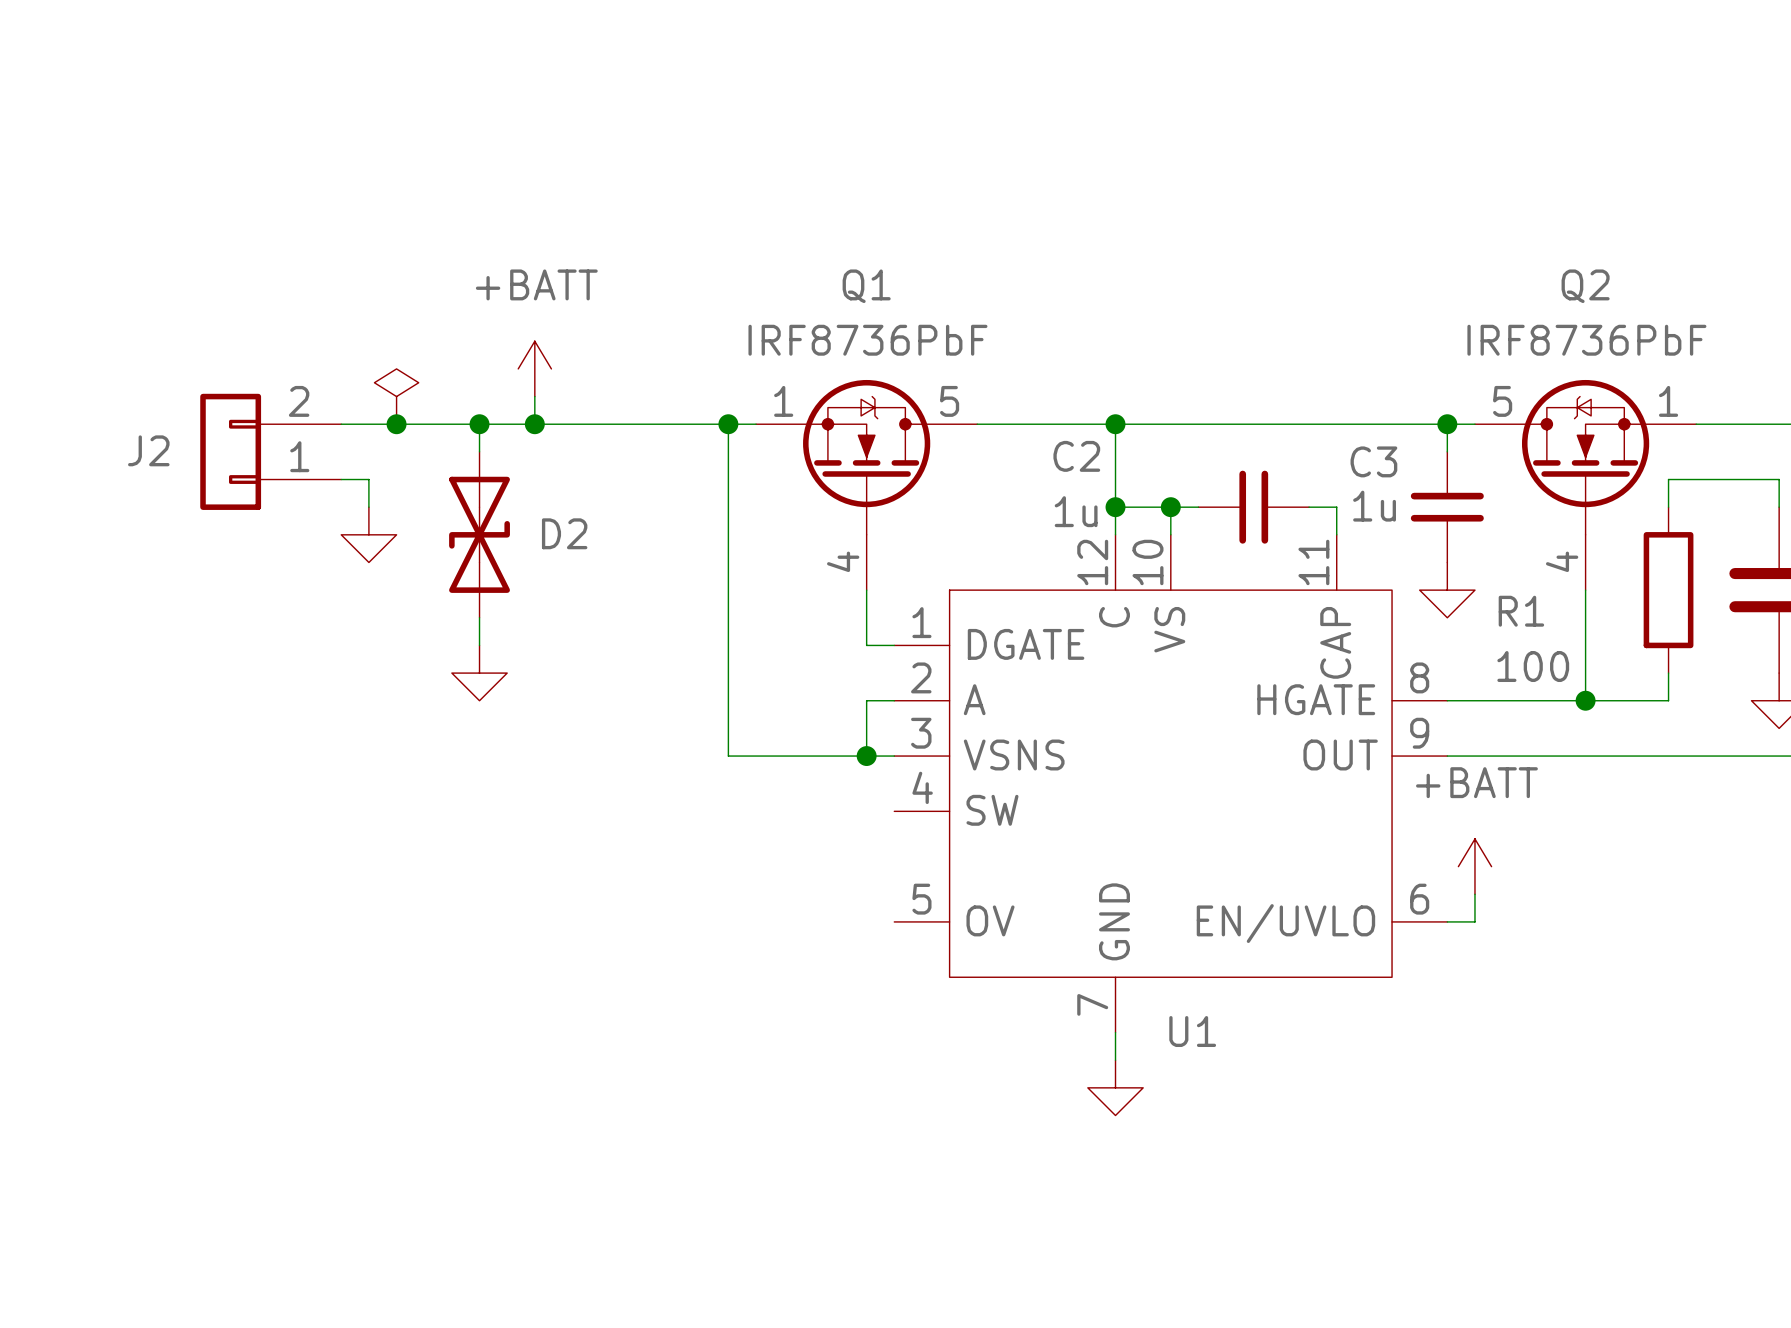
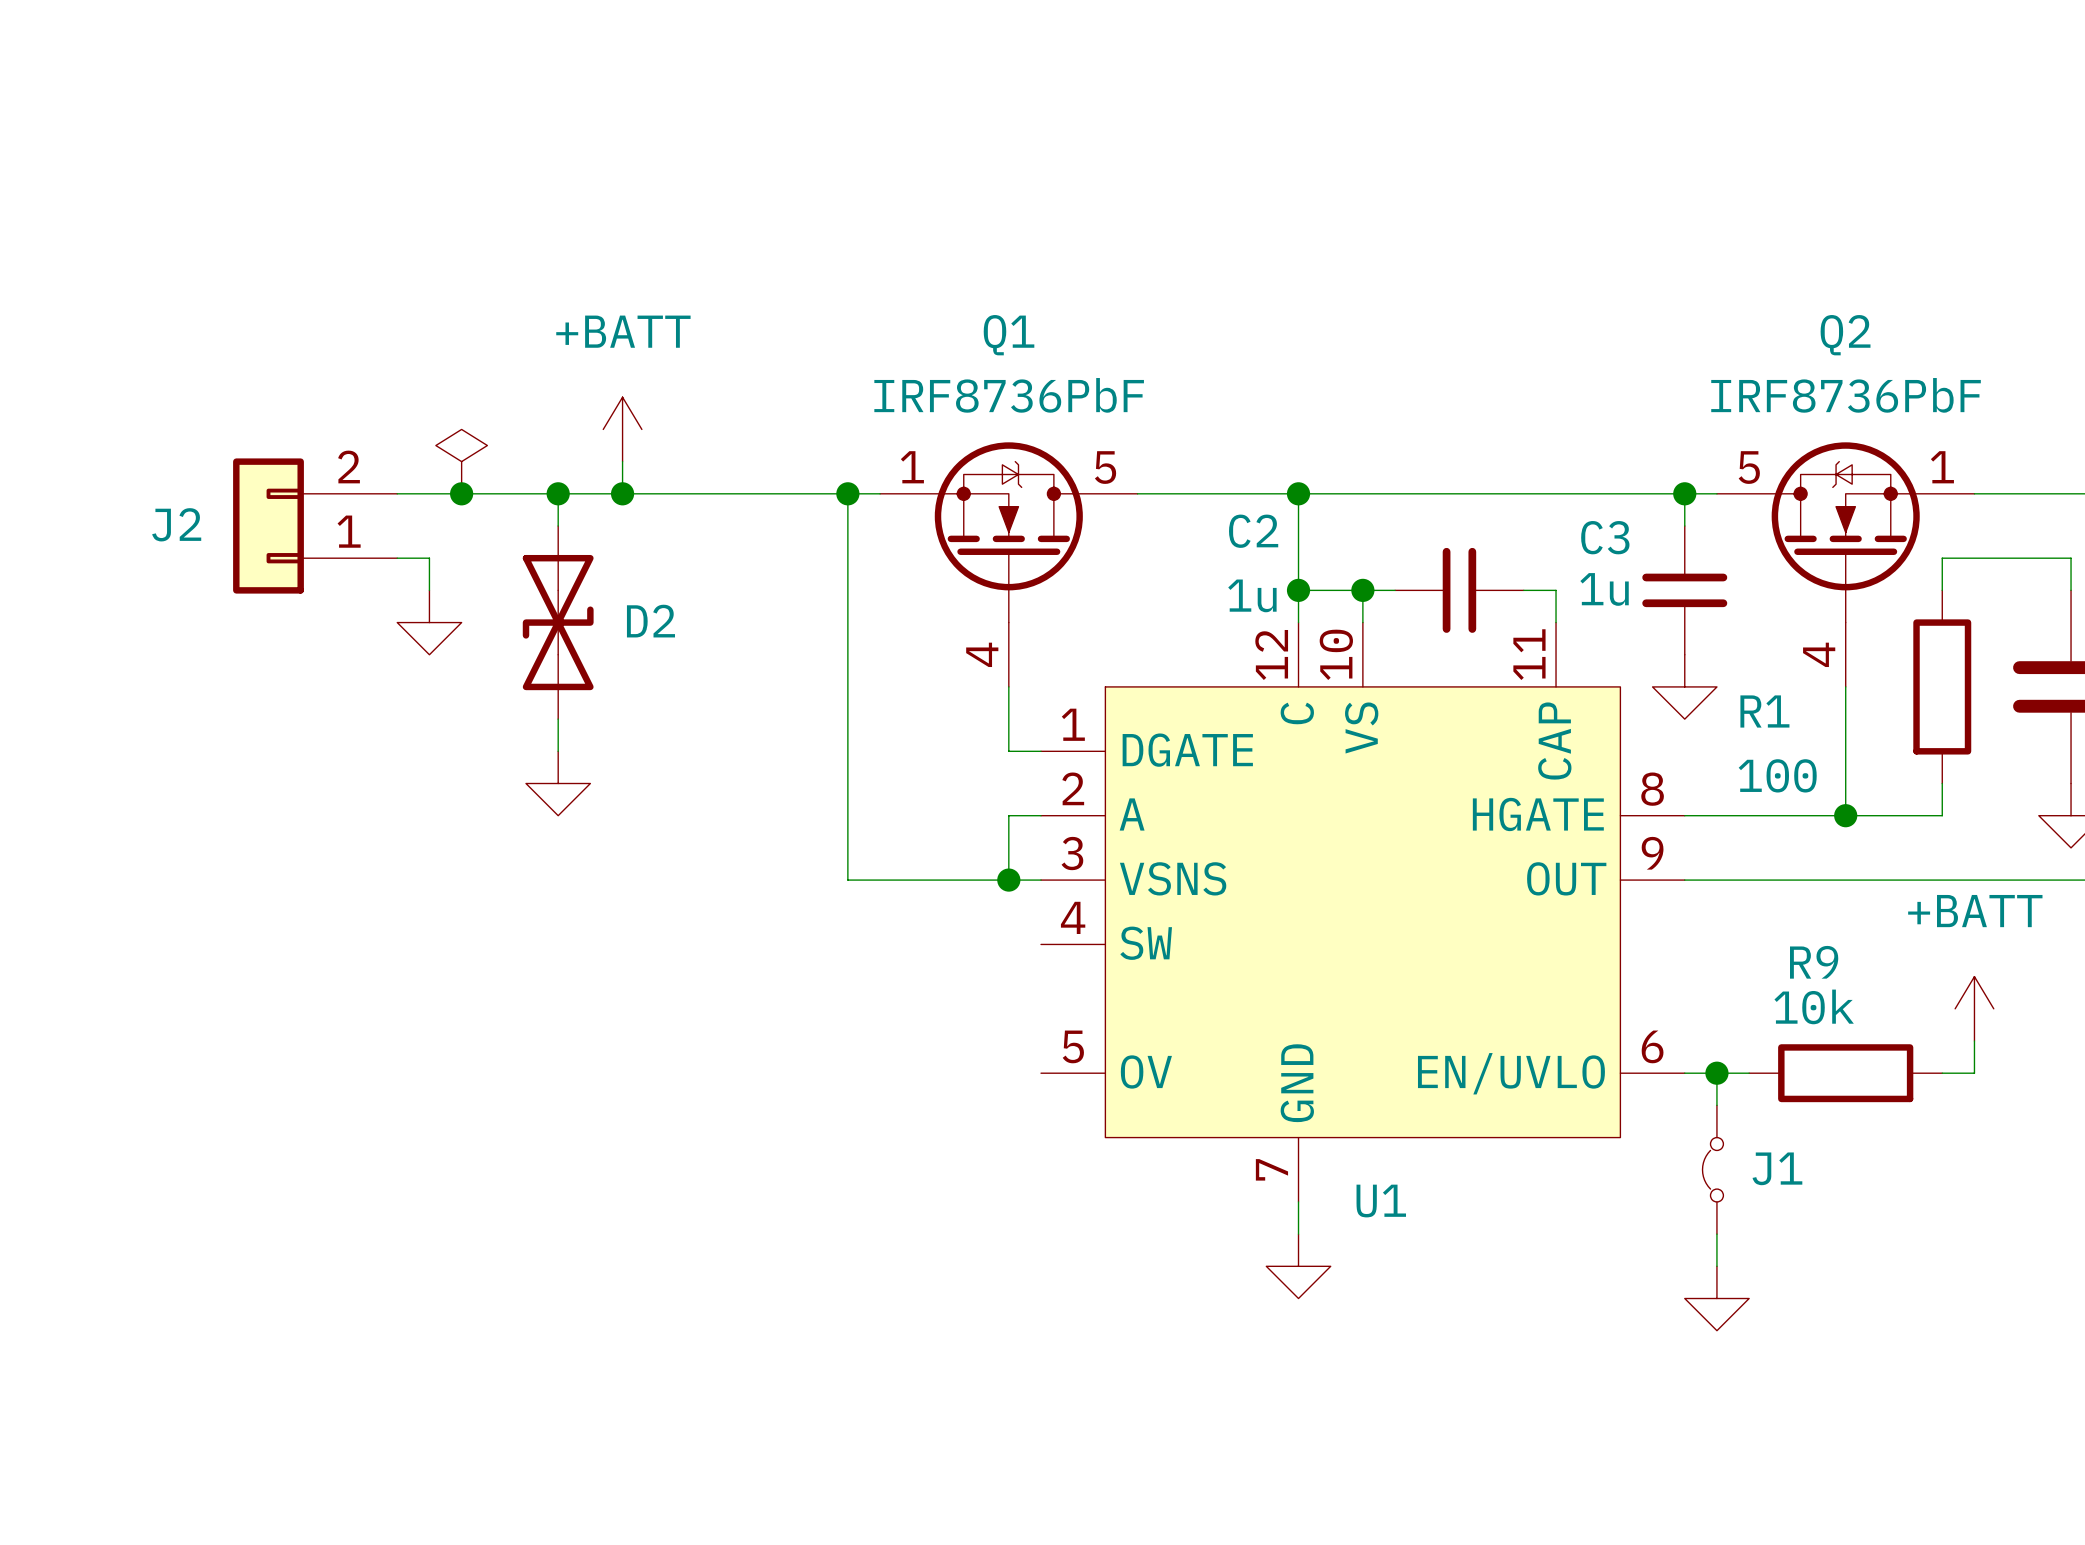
power symbol position: +BATT (1474, 866) -> +BATT (1974, 1008)
wire: (1474, 894) (1474, 921) -> (1716, 1234) (1716, 1266)
wire: none -> (1974, 1041) (1974, 1073) (1942, 1073)
junction: none -> (1716, 1073)
wire: none -> (1749, 1073) (1716, 1073) (1716, 1105)
R9: none -> 10k (1845, 1073)
J1: none -> (1712, 1169)
power symbol: none -> (1716, 1298)

